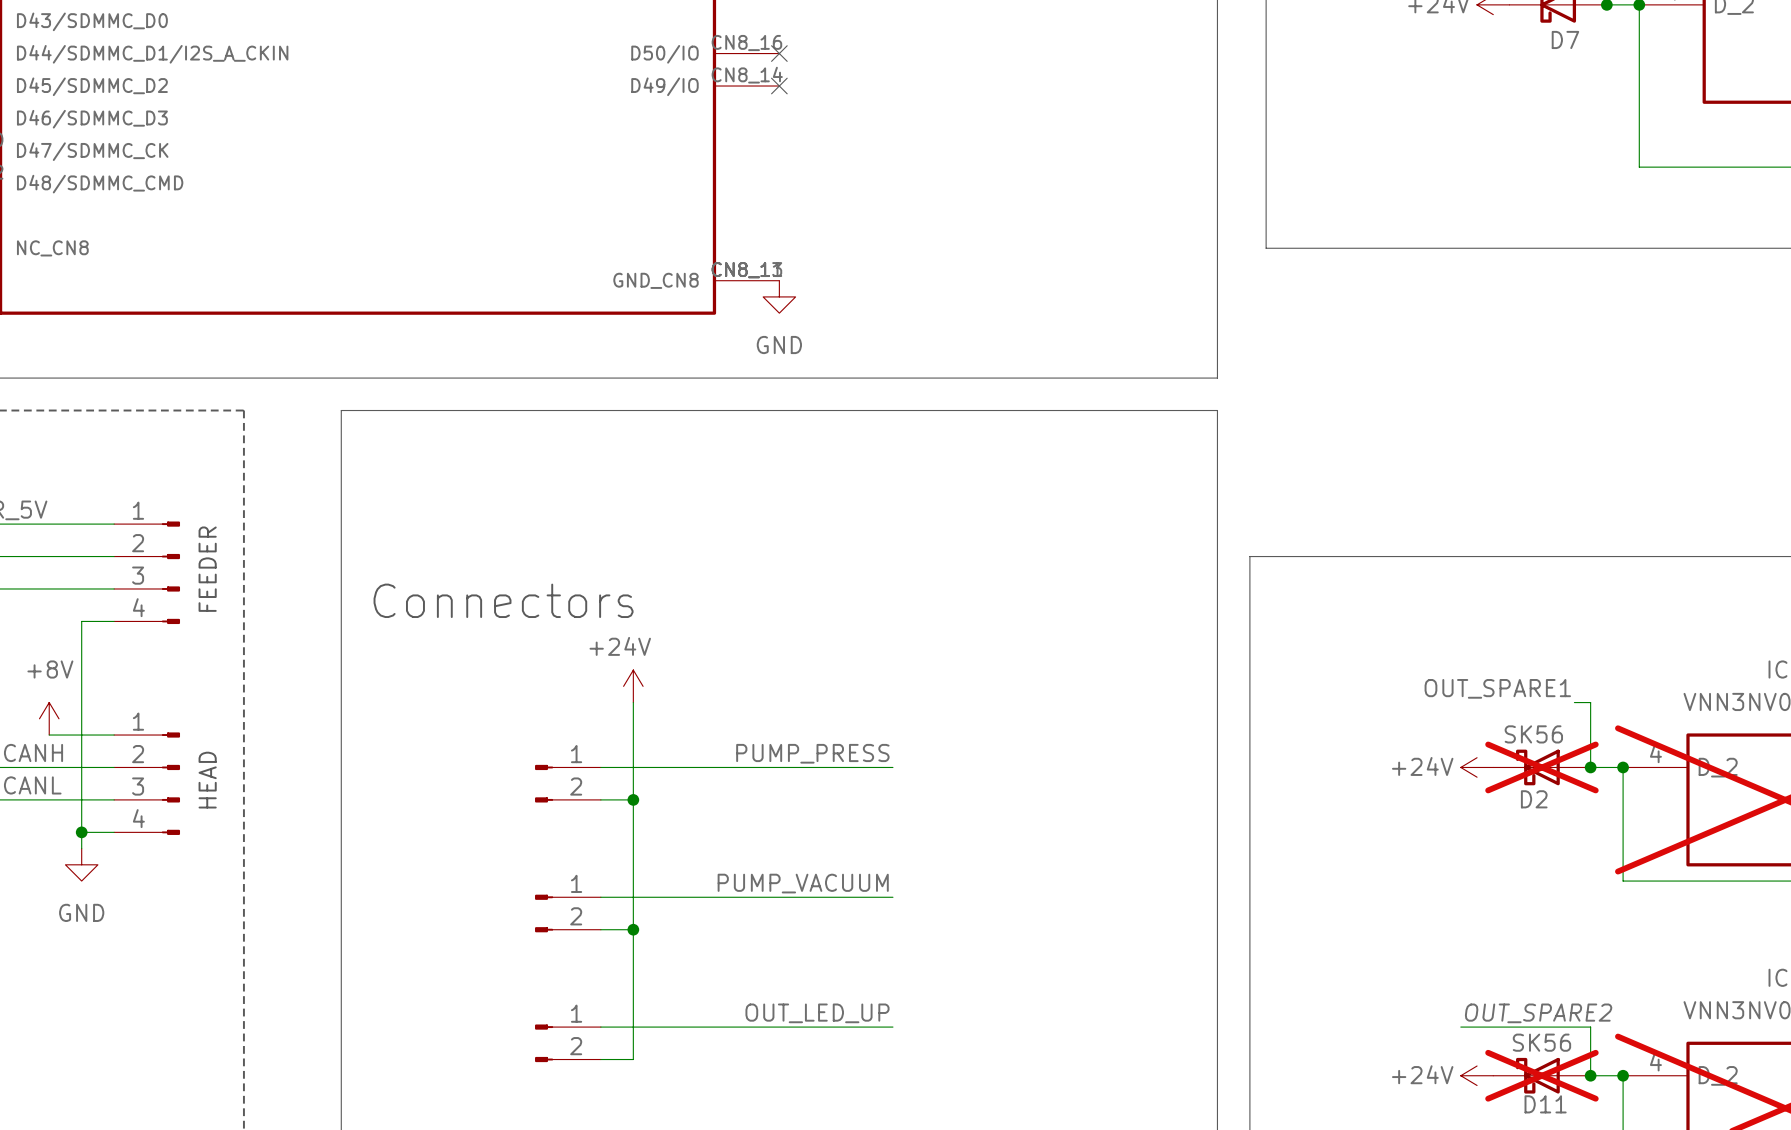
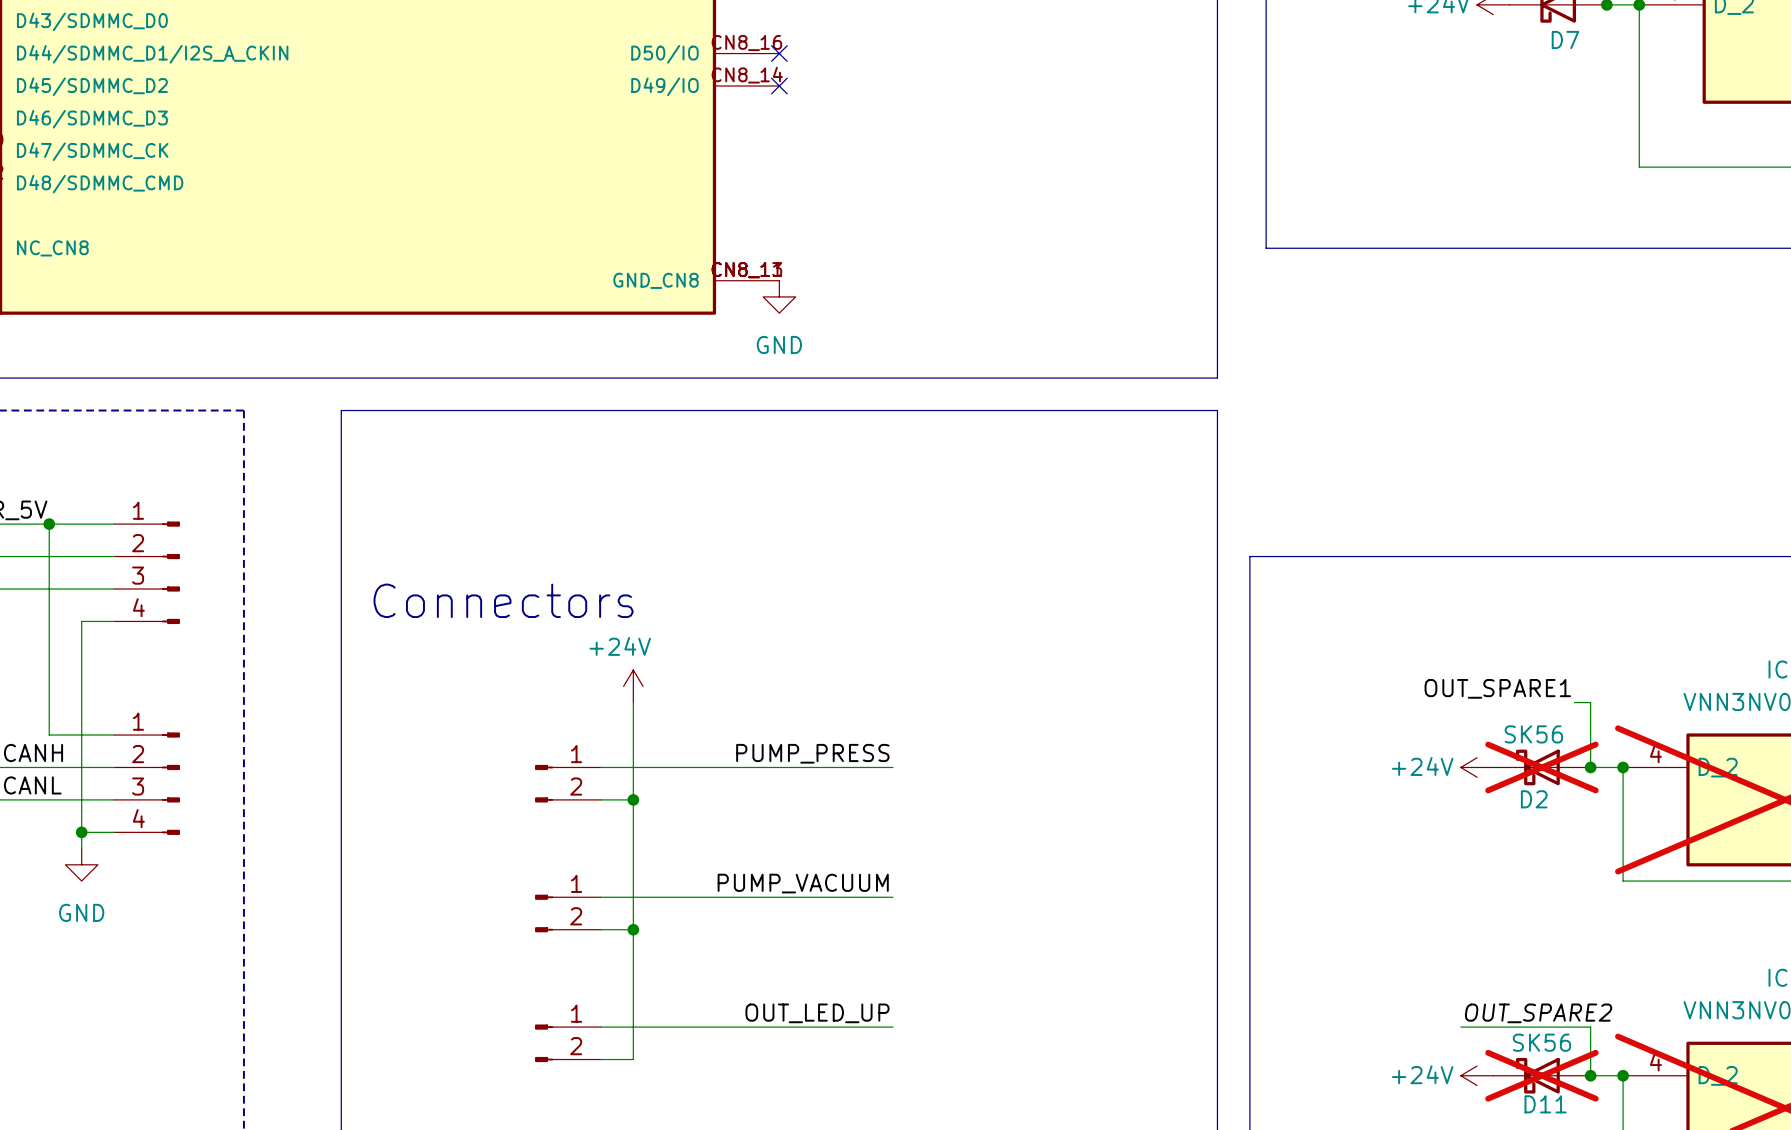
wire: none -> (49, 524) (49, 735)
junction: none -> (49, 524)
text: FEEDER (207, 569) -> none
power symbol: +8V (49, 718) -> none
text: HEAD (207, 780) -> none

